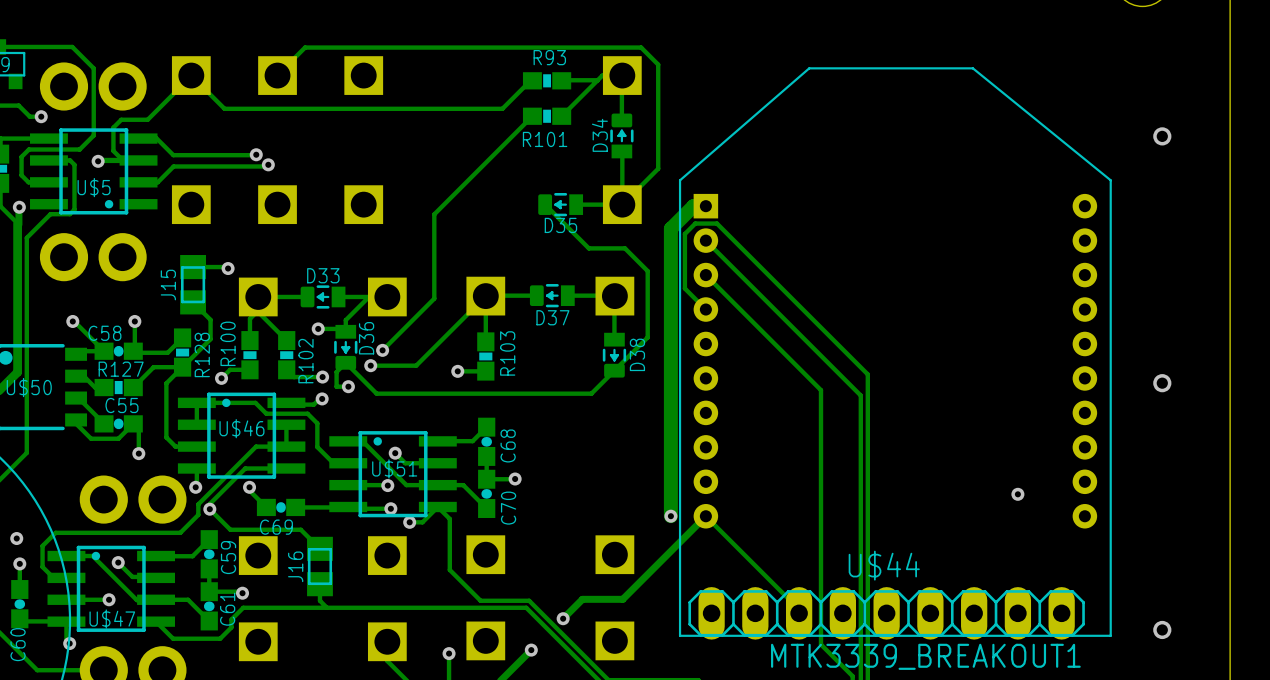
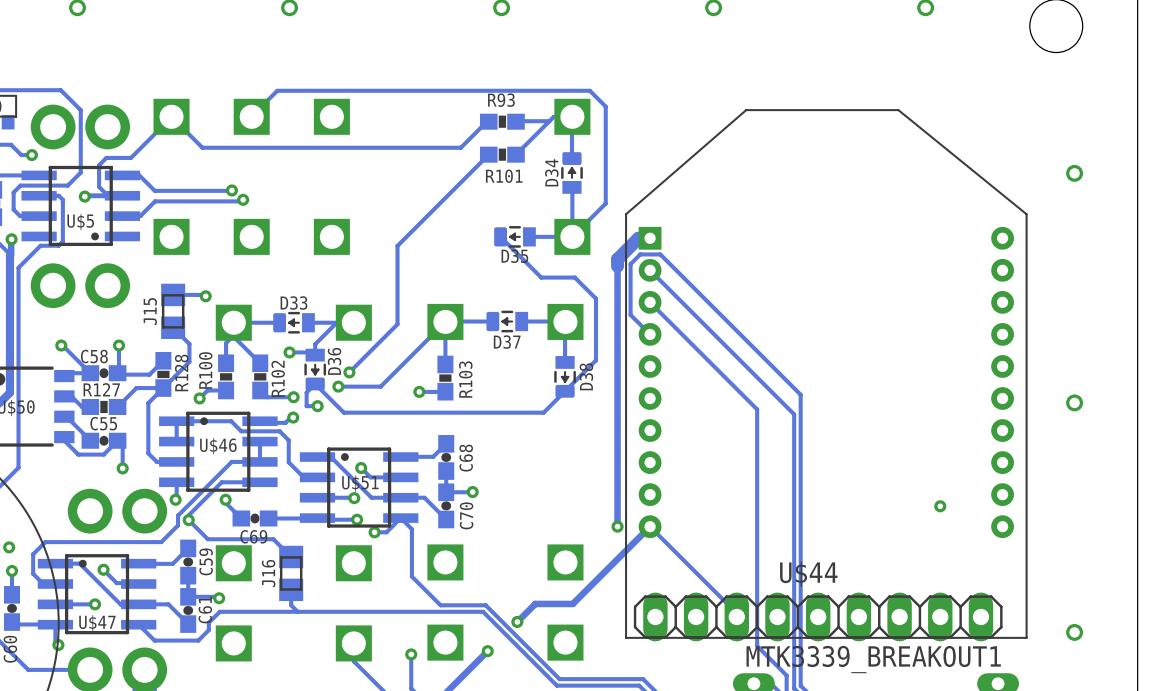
track width: thick (670, 236) (670, 516) -> thin (617, 266) (617, 526)

